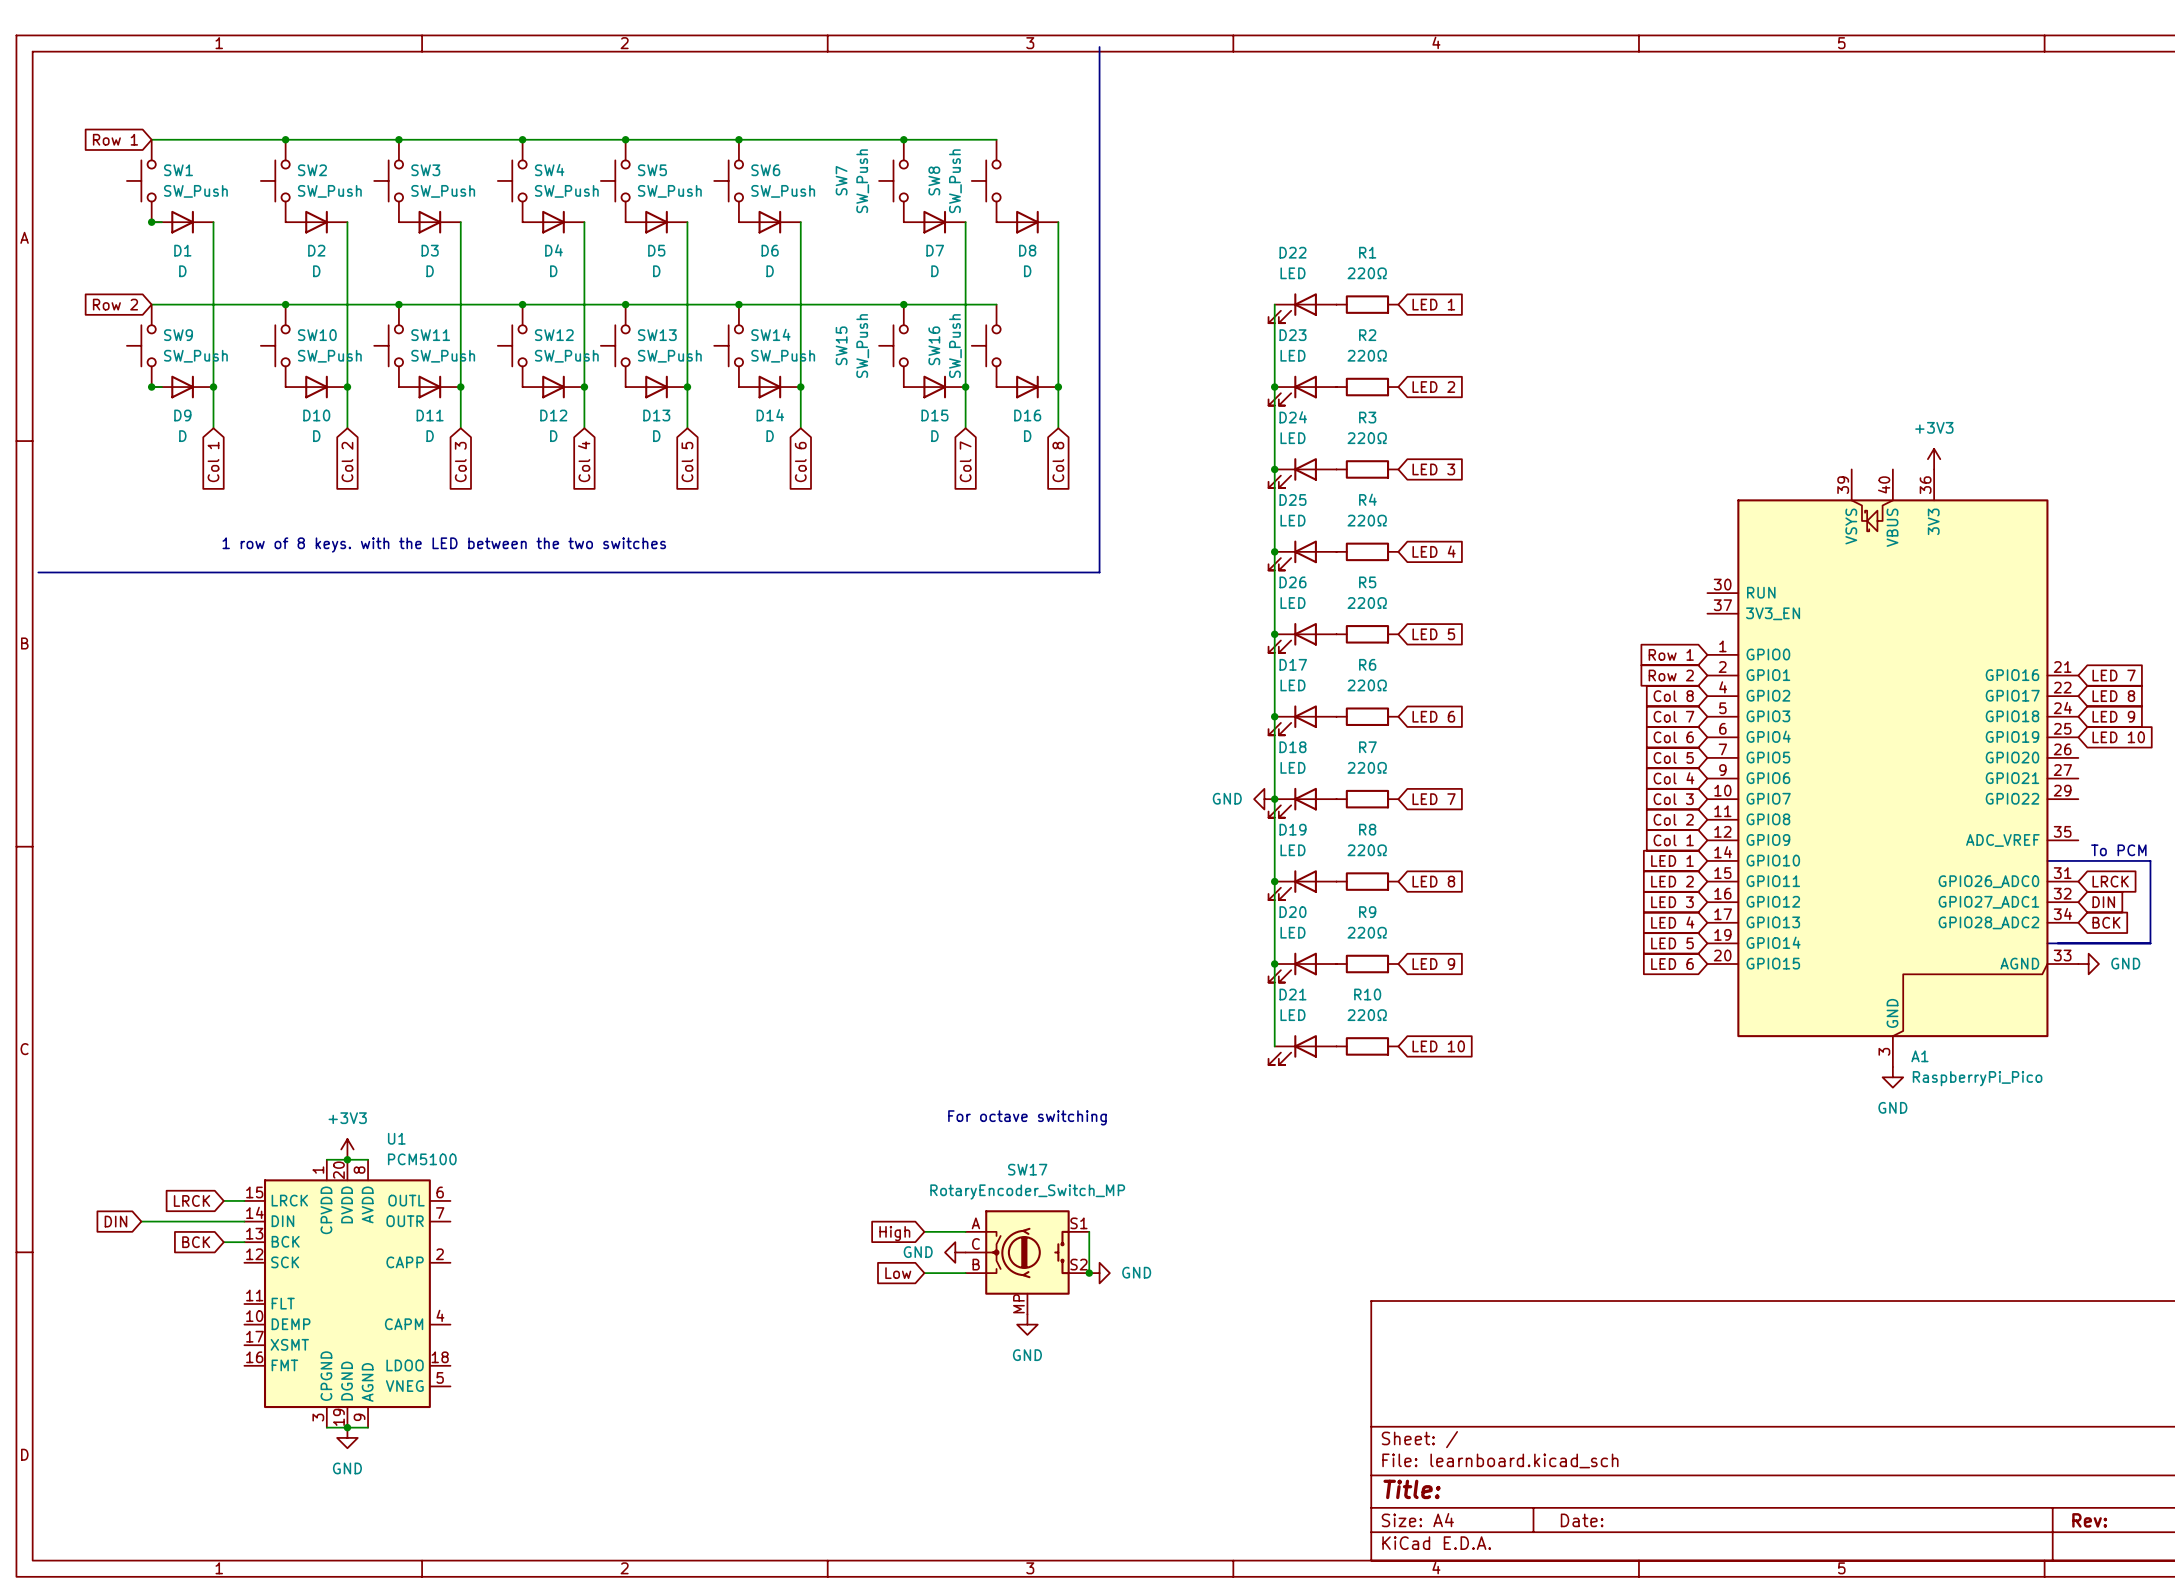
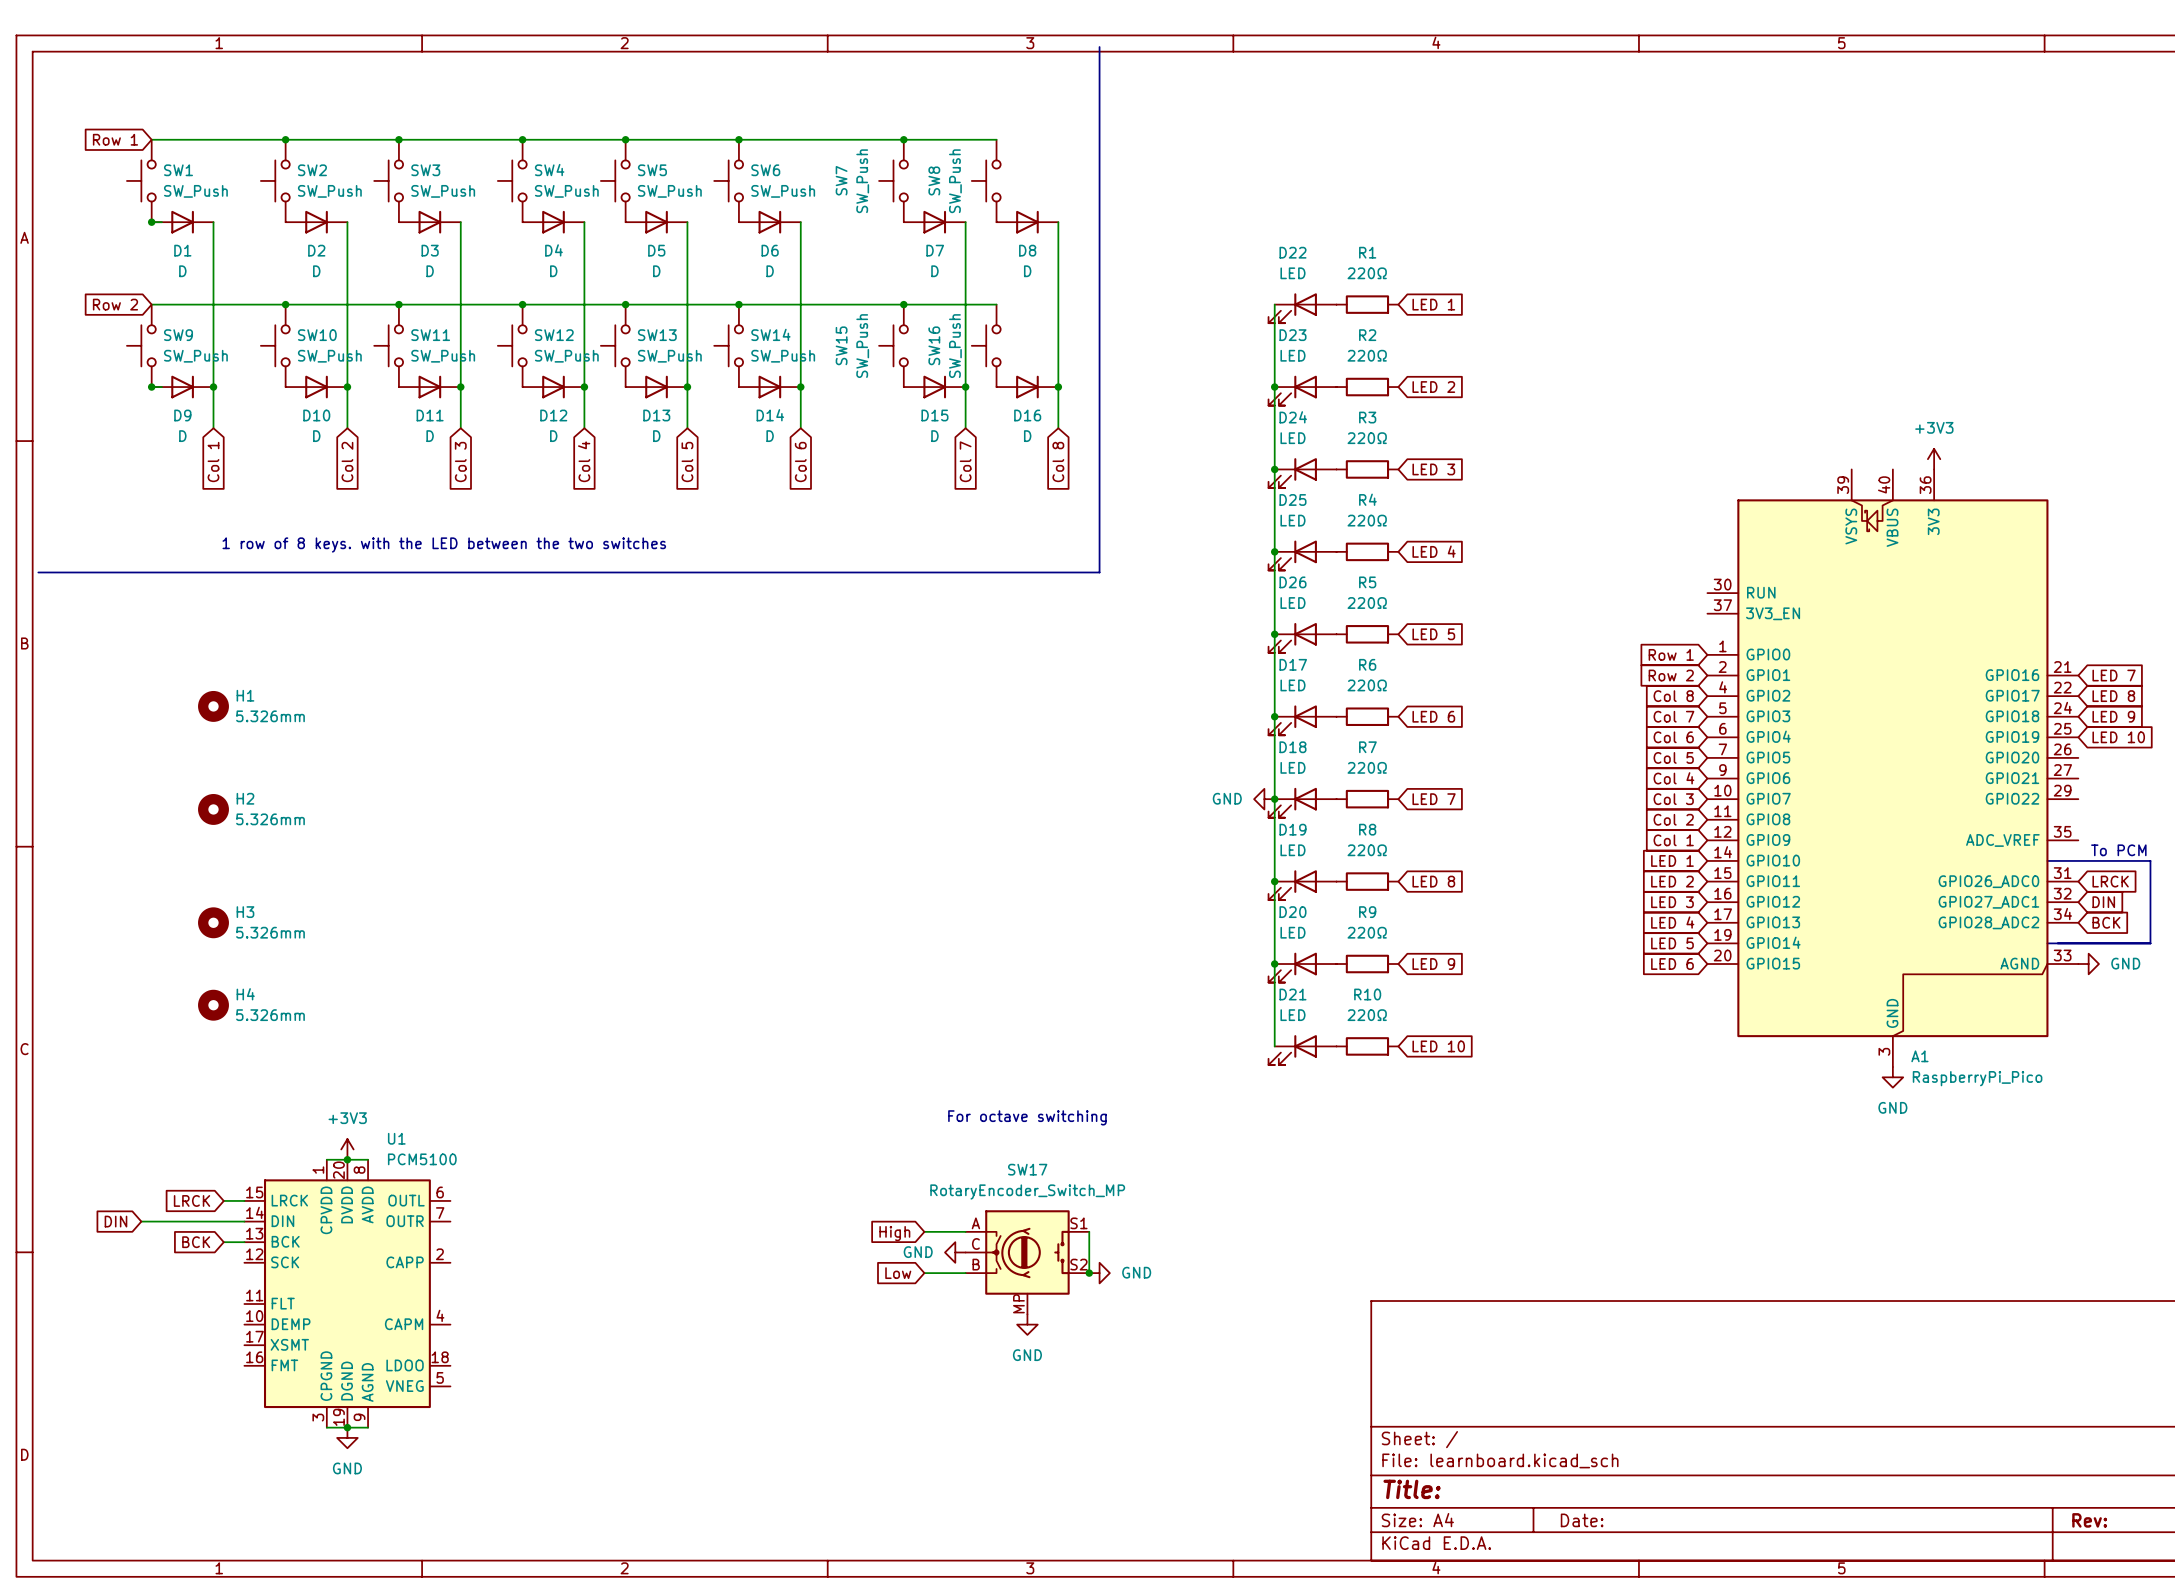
H1: none -> 5.326mm (213, 706)
H2: none -> 5.326mm (213, 809)
H3: none -> 5.326mm (213, 922)
H4: none -> 5.326mm (213, 1005)

